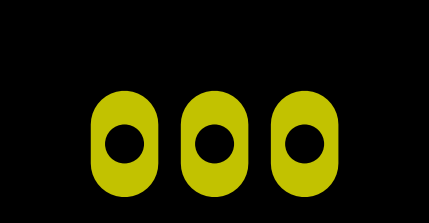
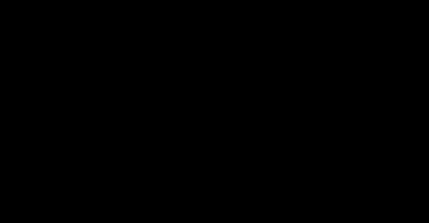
part: (214, 143) -> none

